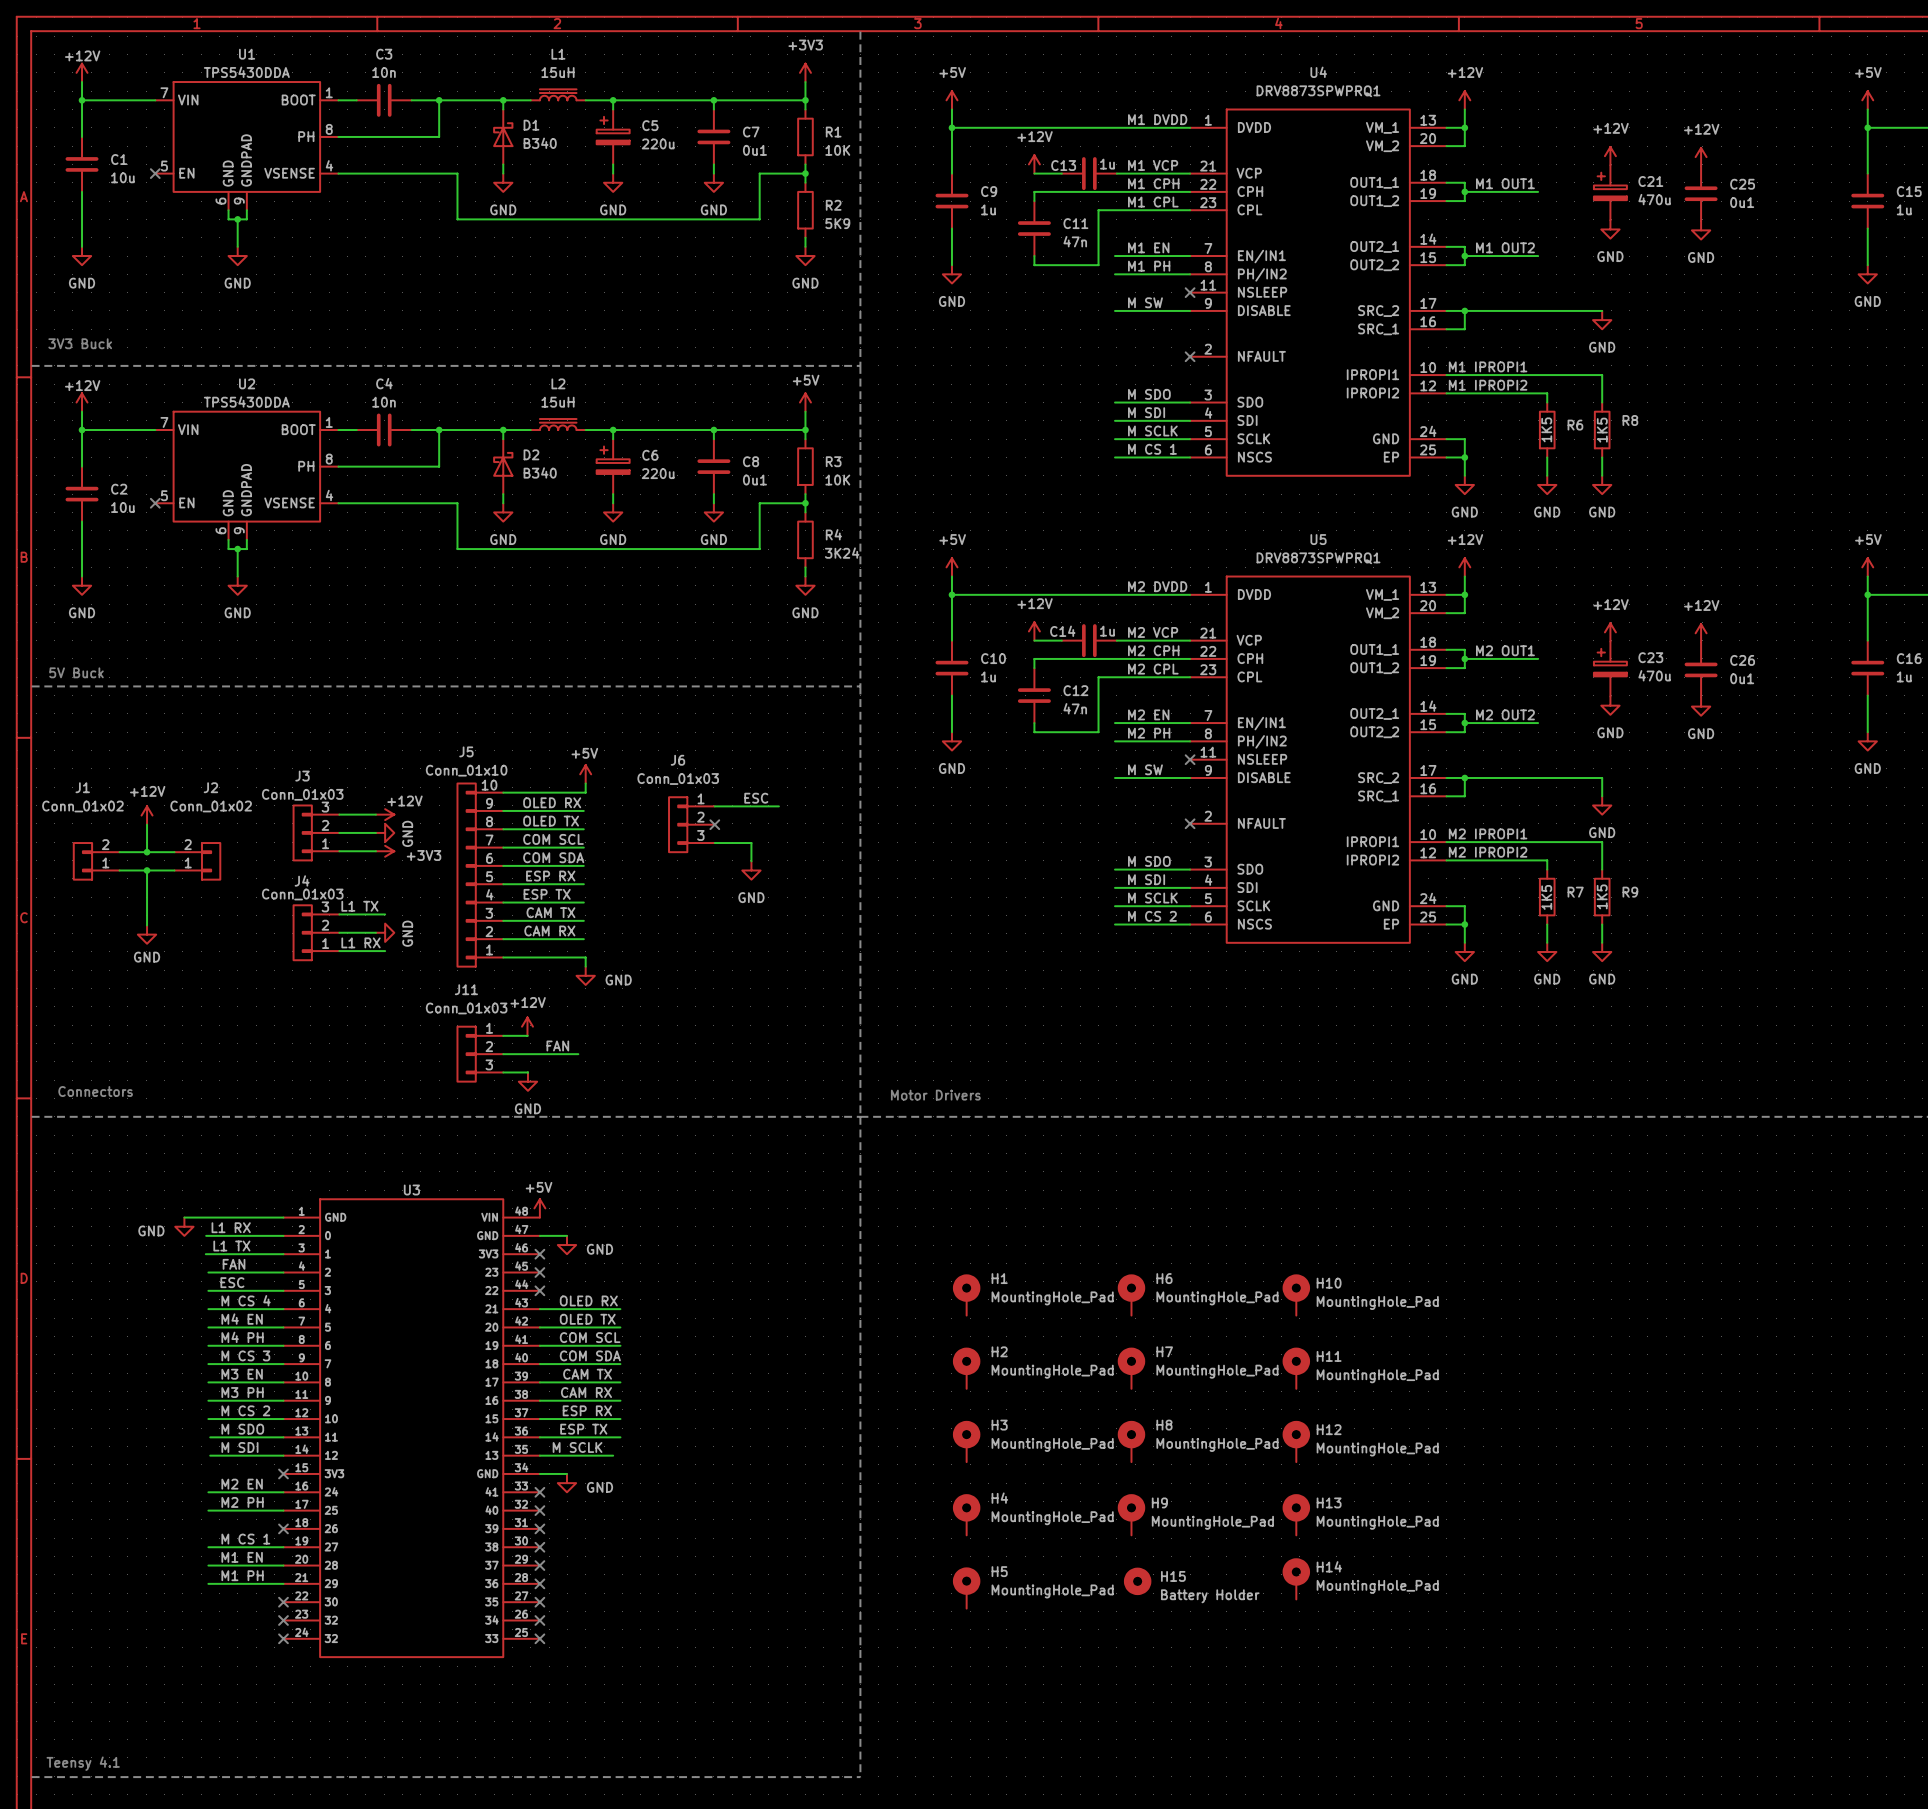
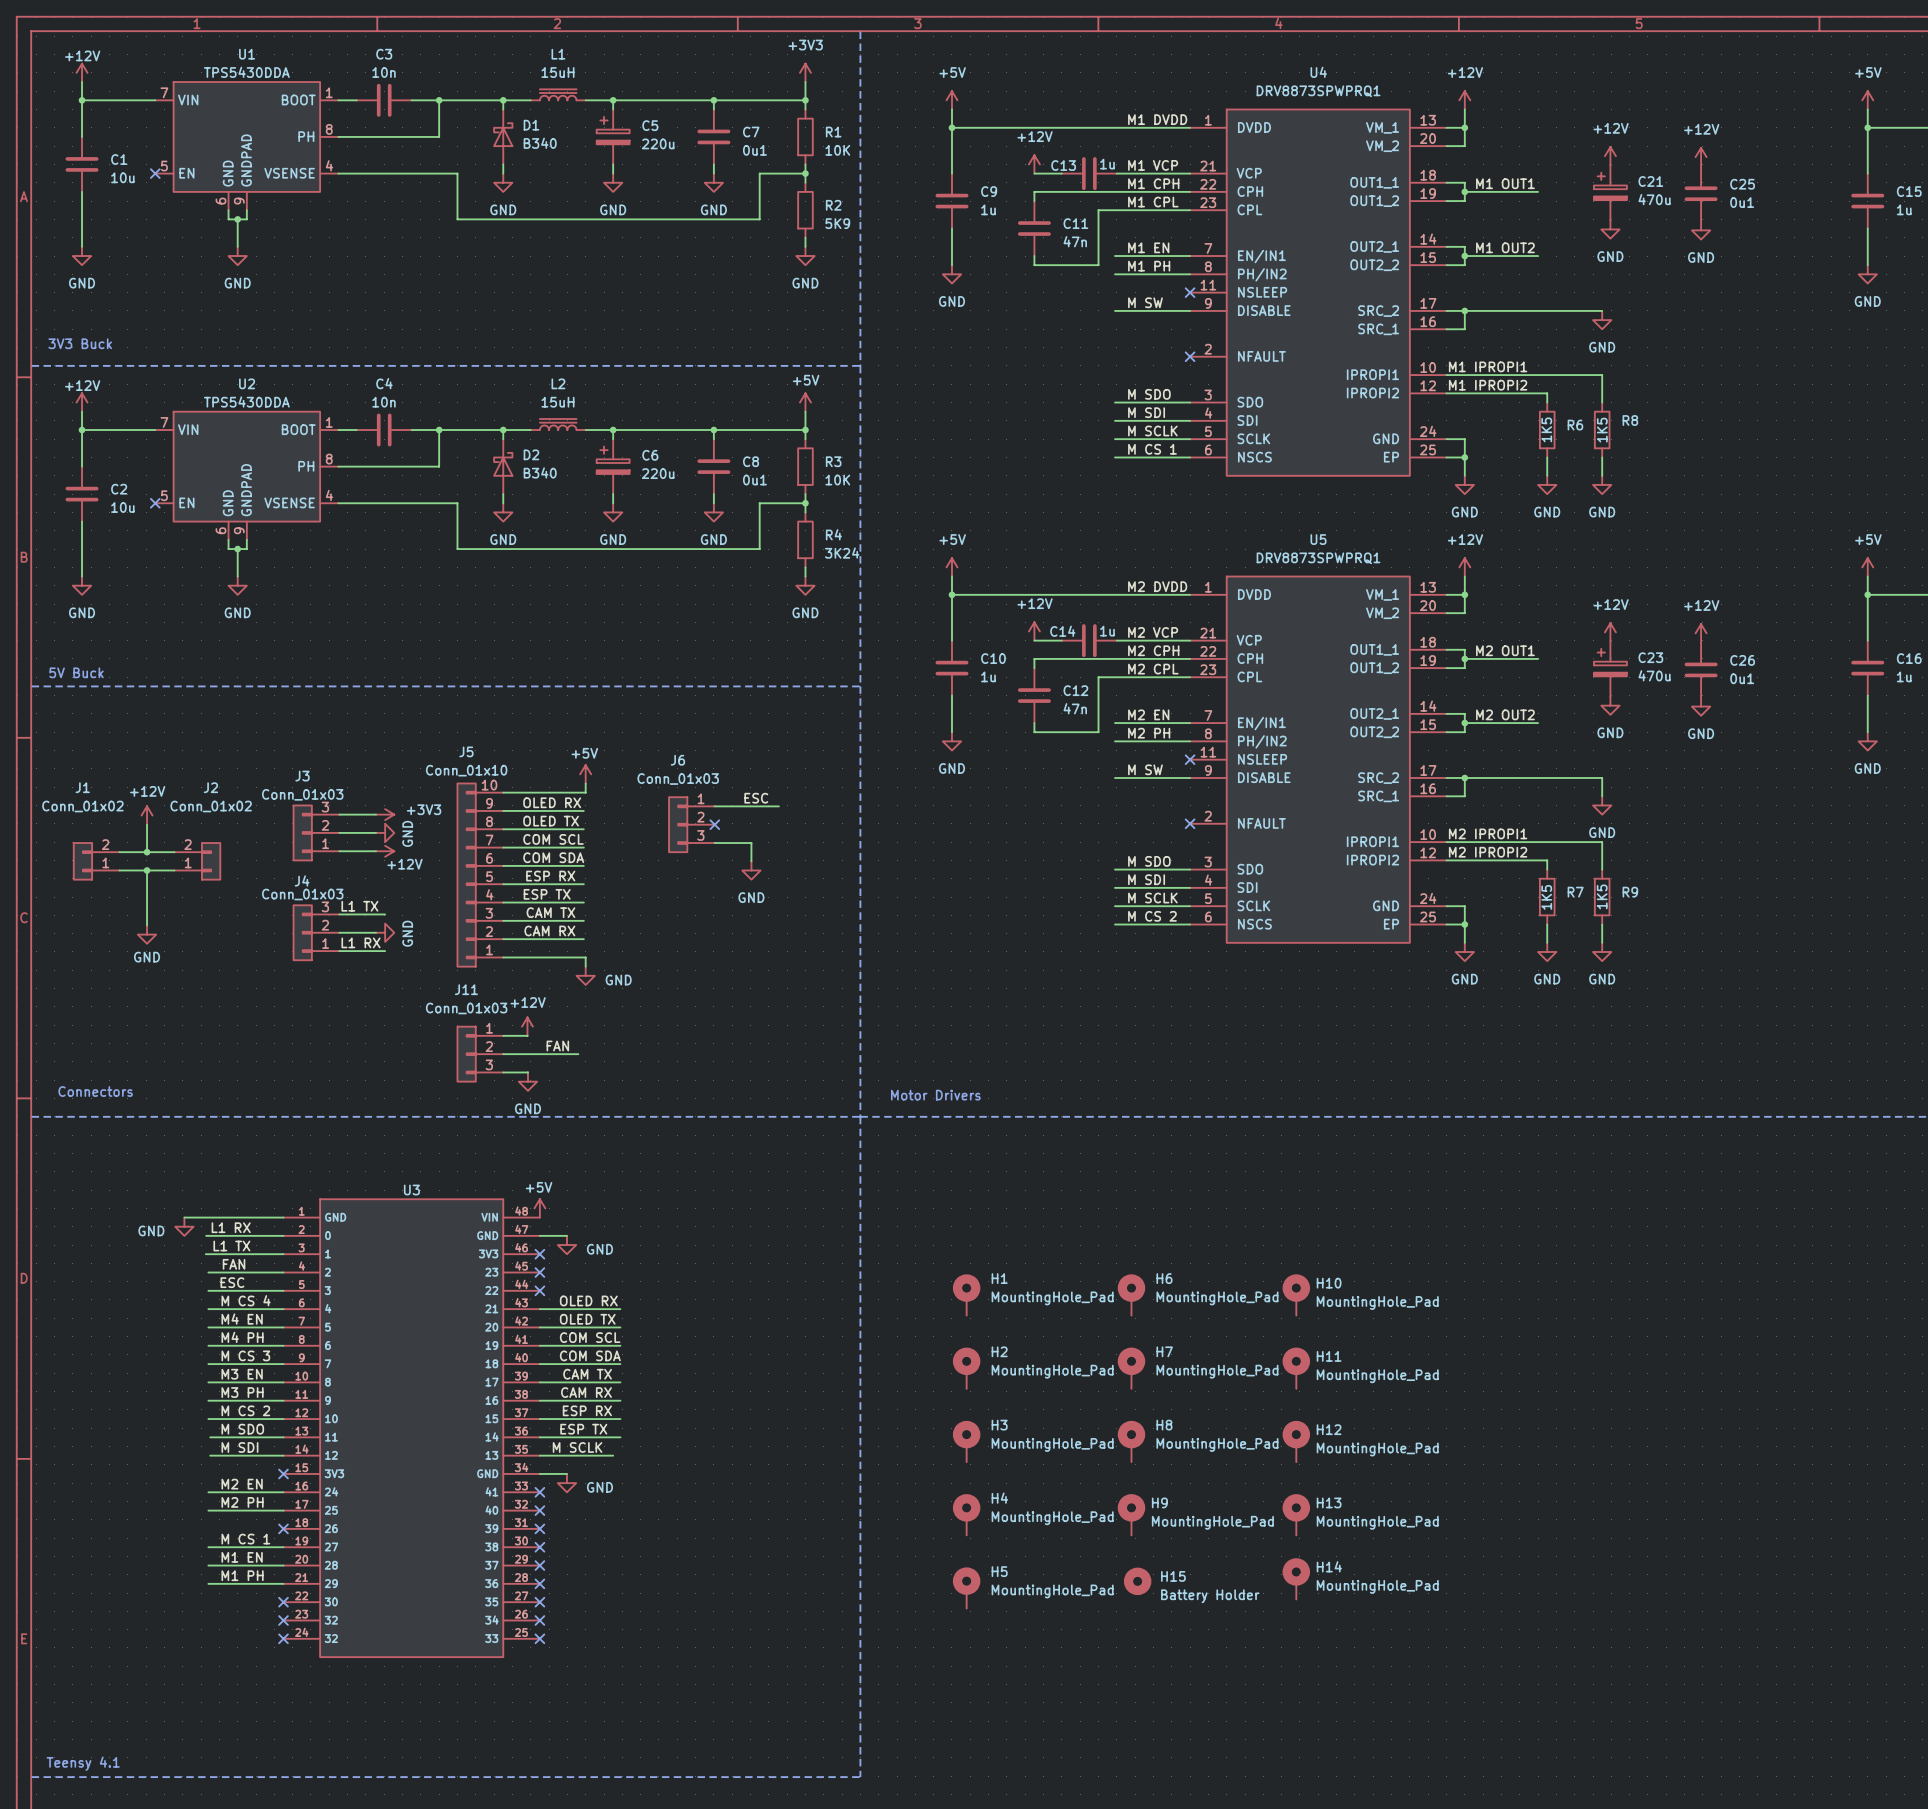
power symbol: +12V (385, 814) -> +3V3 (385, 814)
power symbol: +3V3 (385, 851) -> +12V (385, 851)

